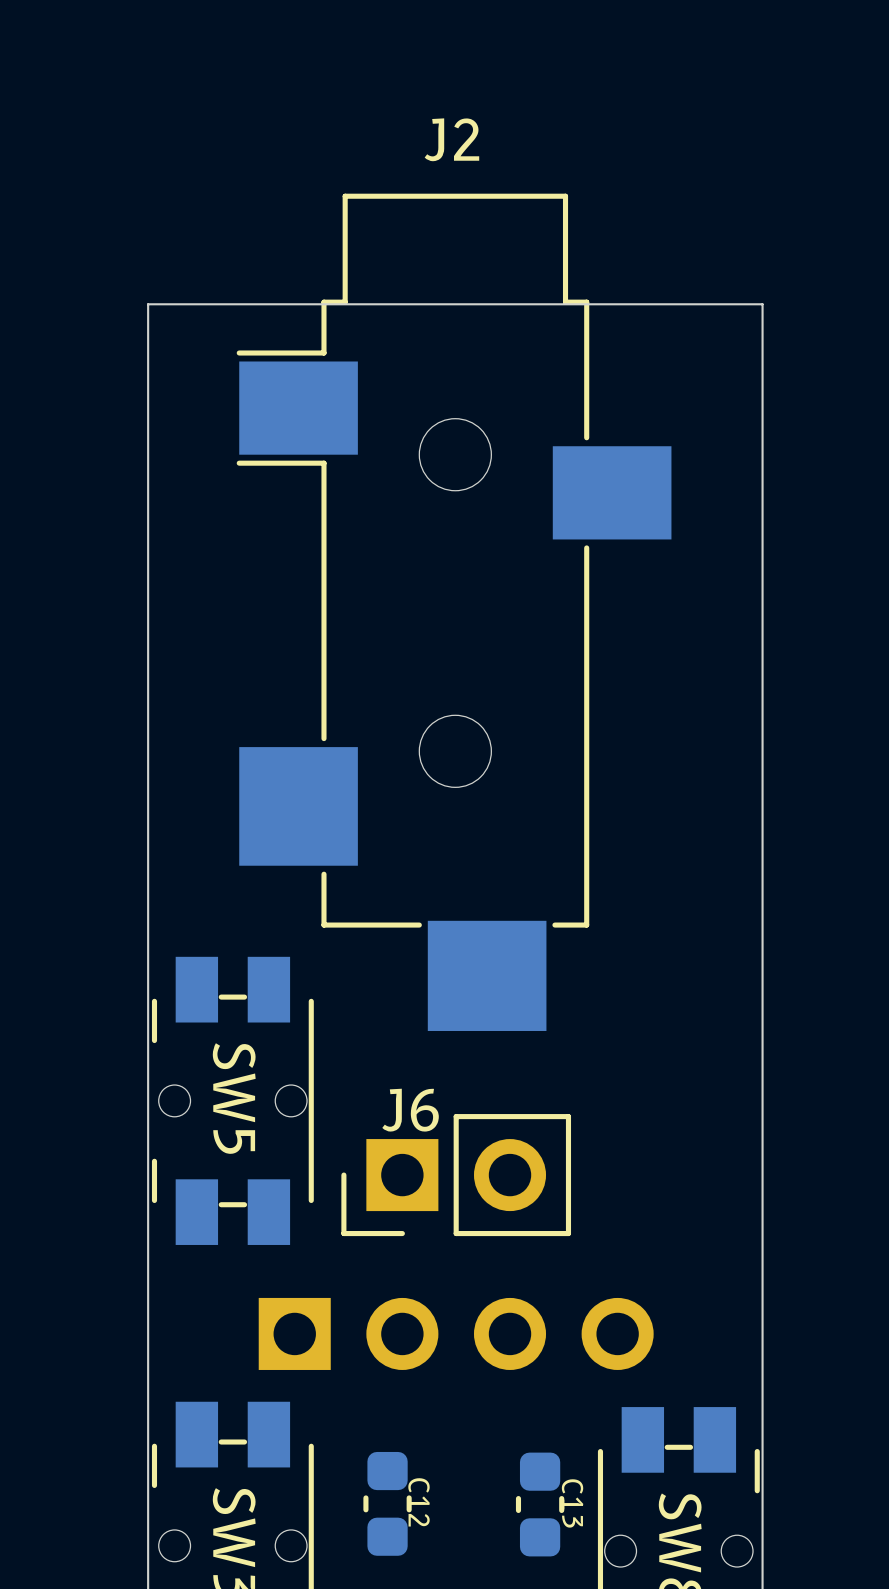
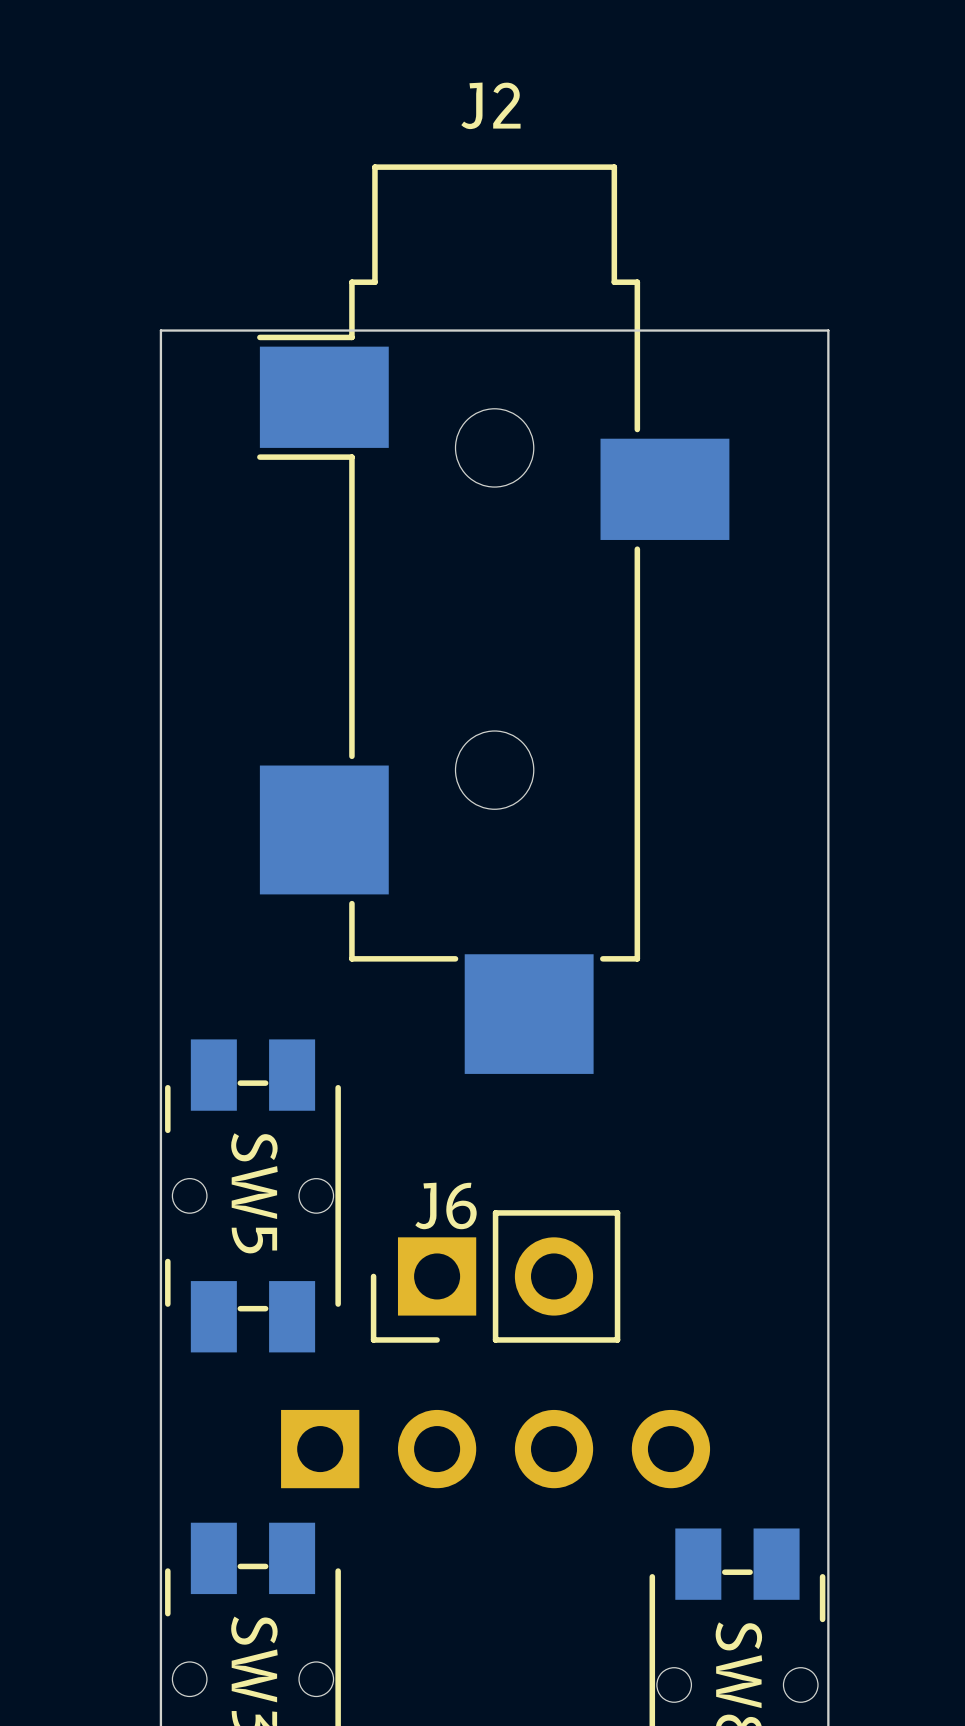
J2 position: (454, 612) -> (493, 619)
C12: (387, 1503) -> none
C13: (540, 1504) -> none

